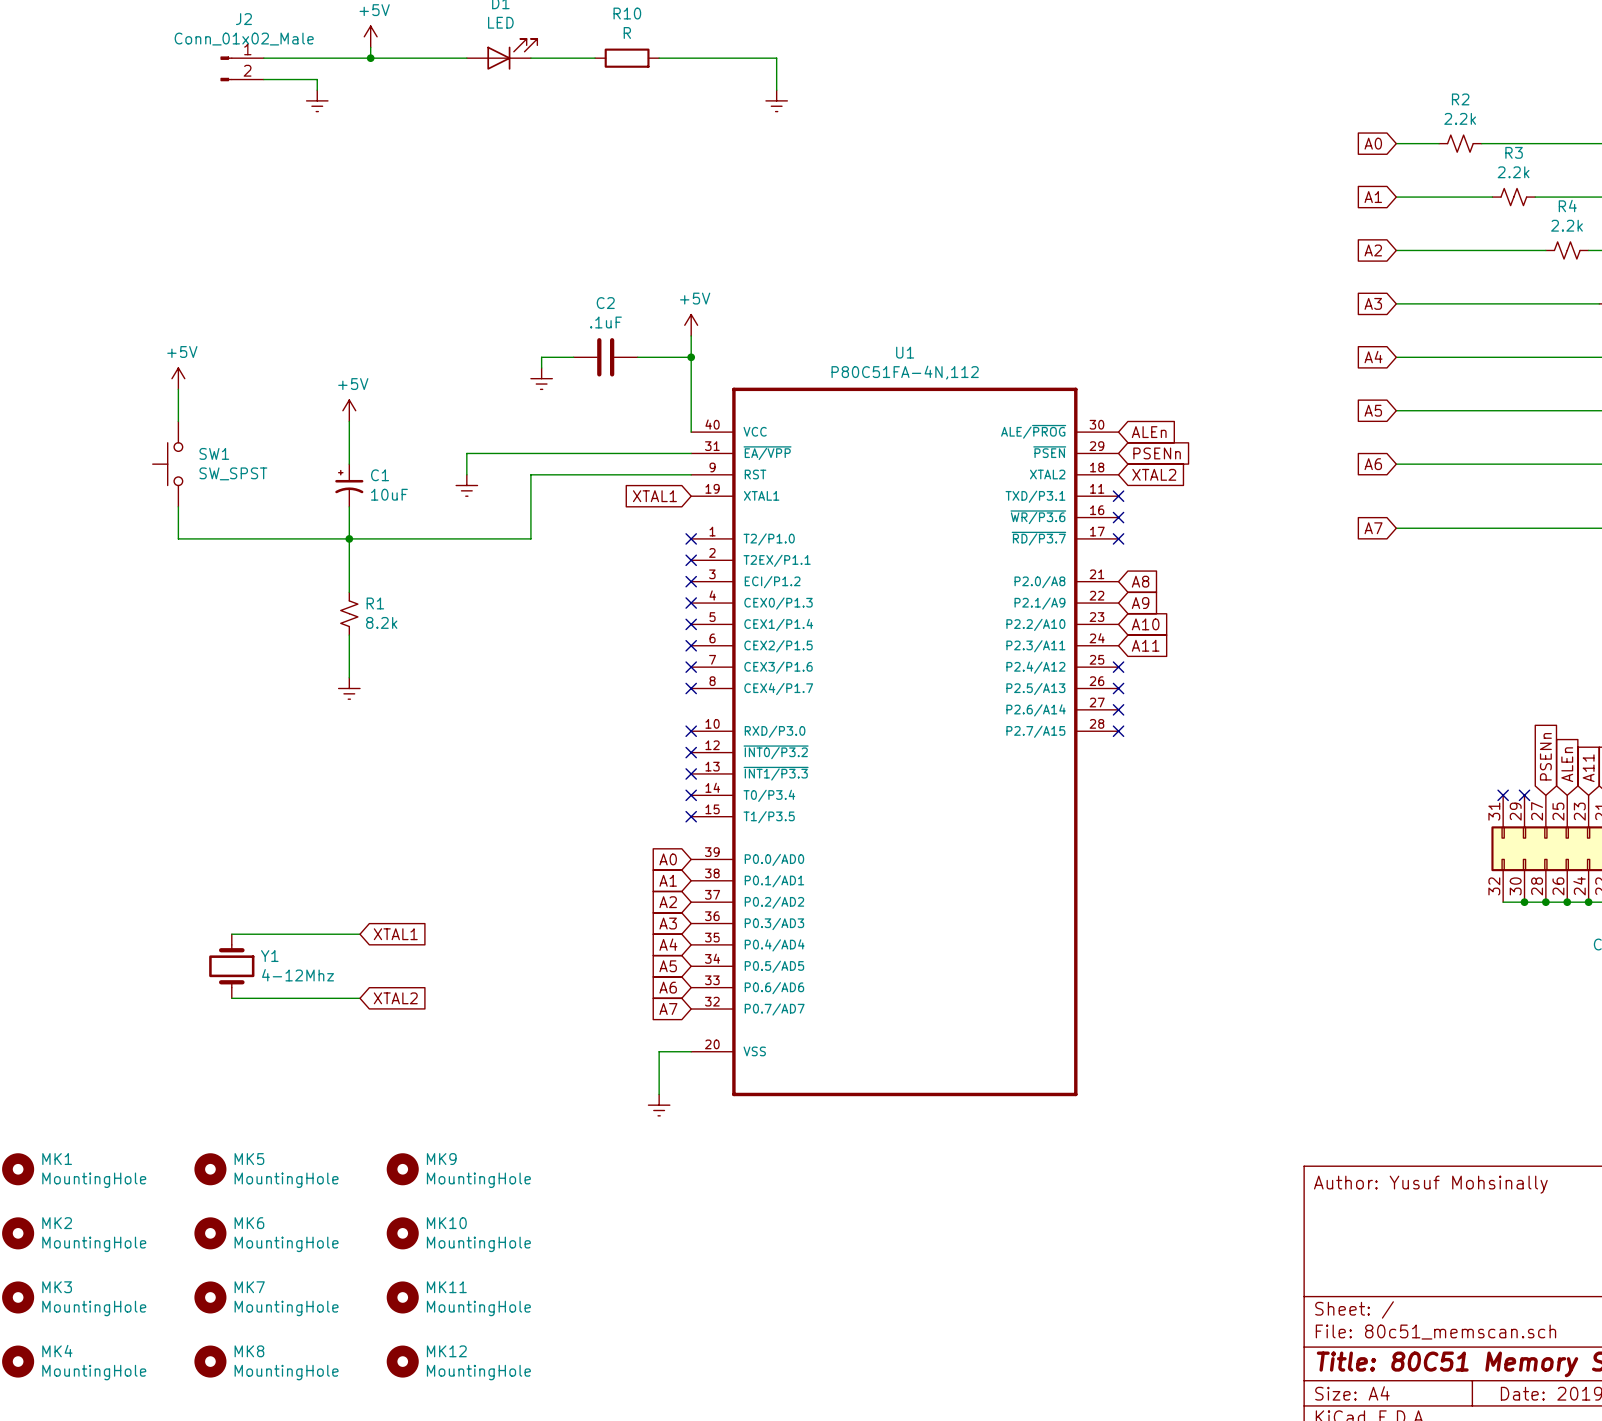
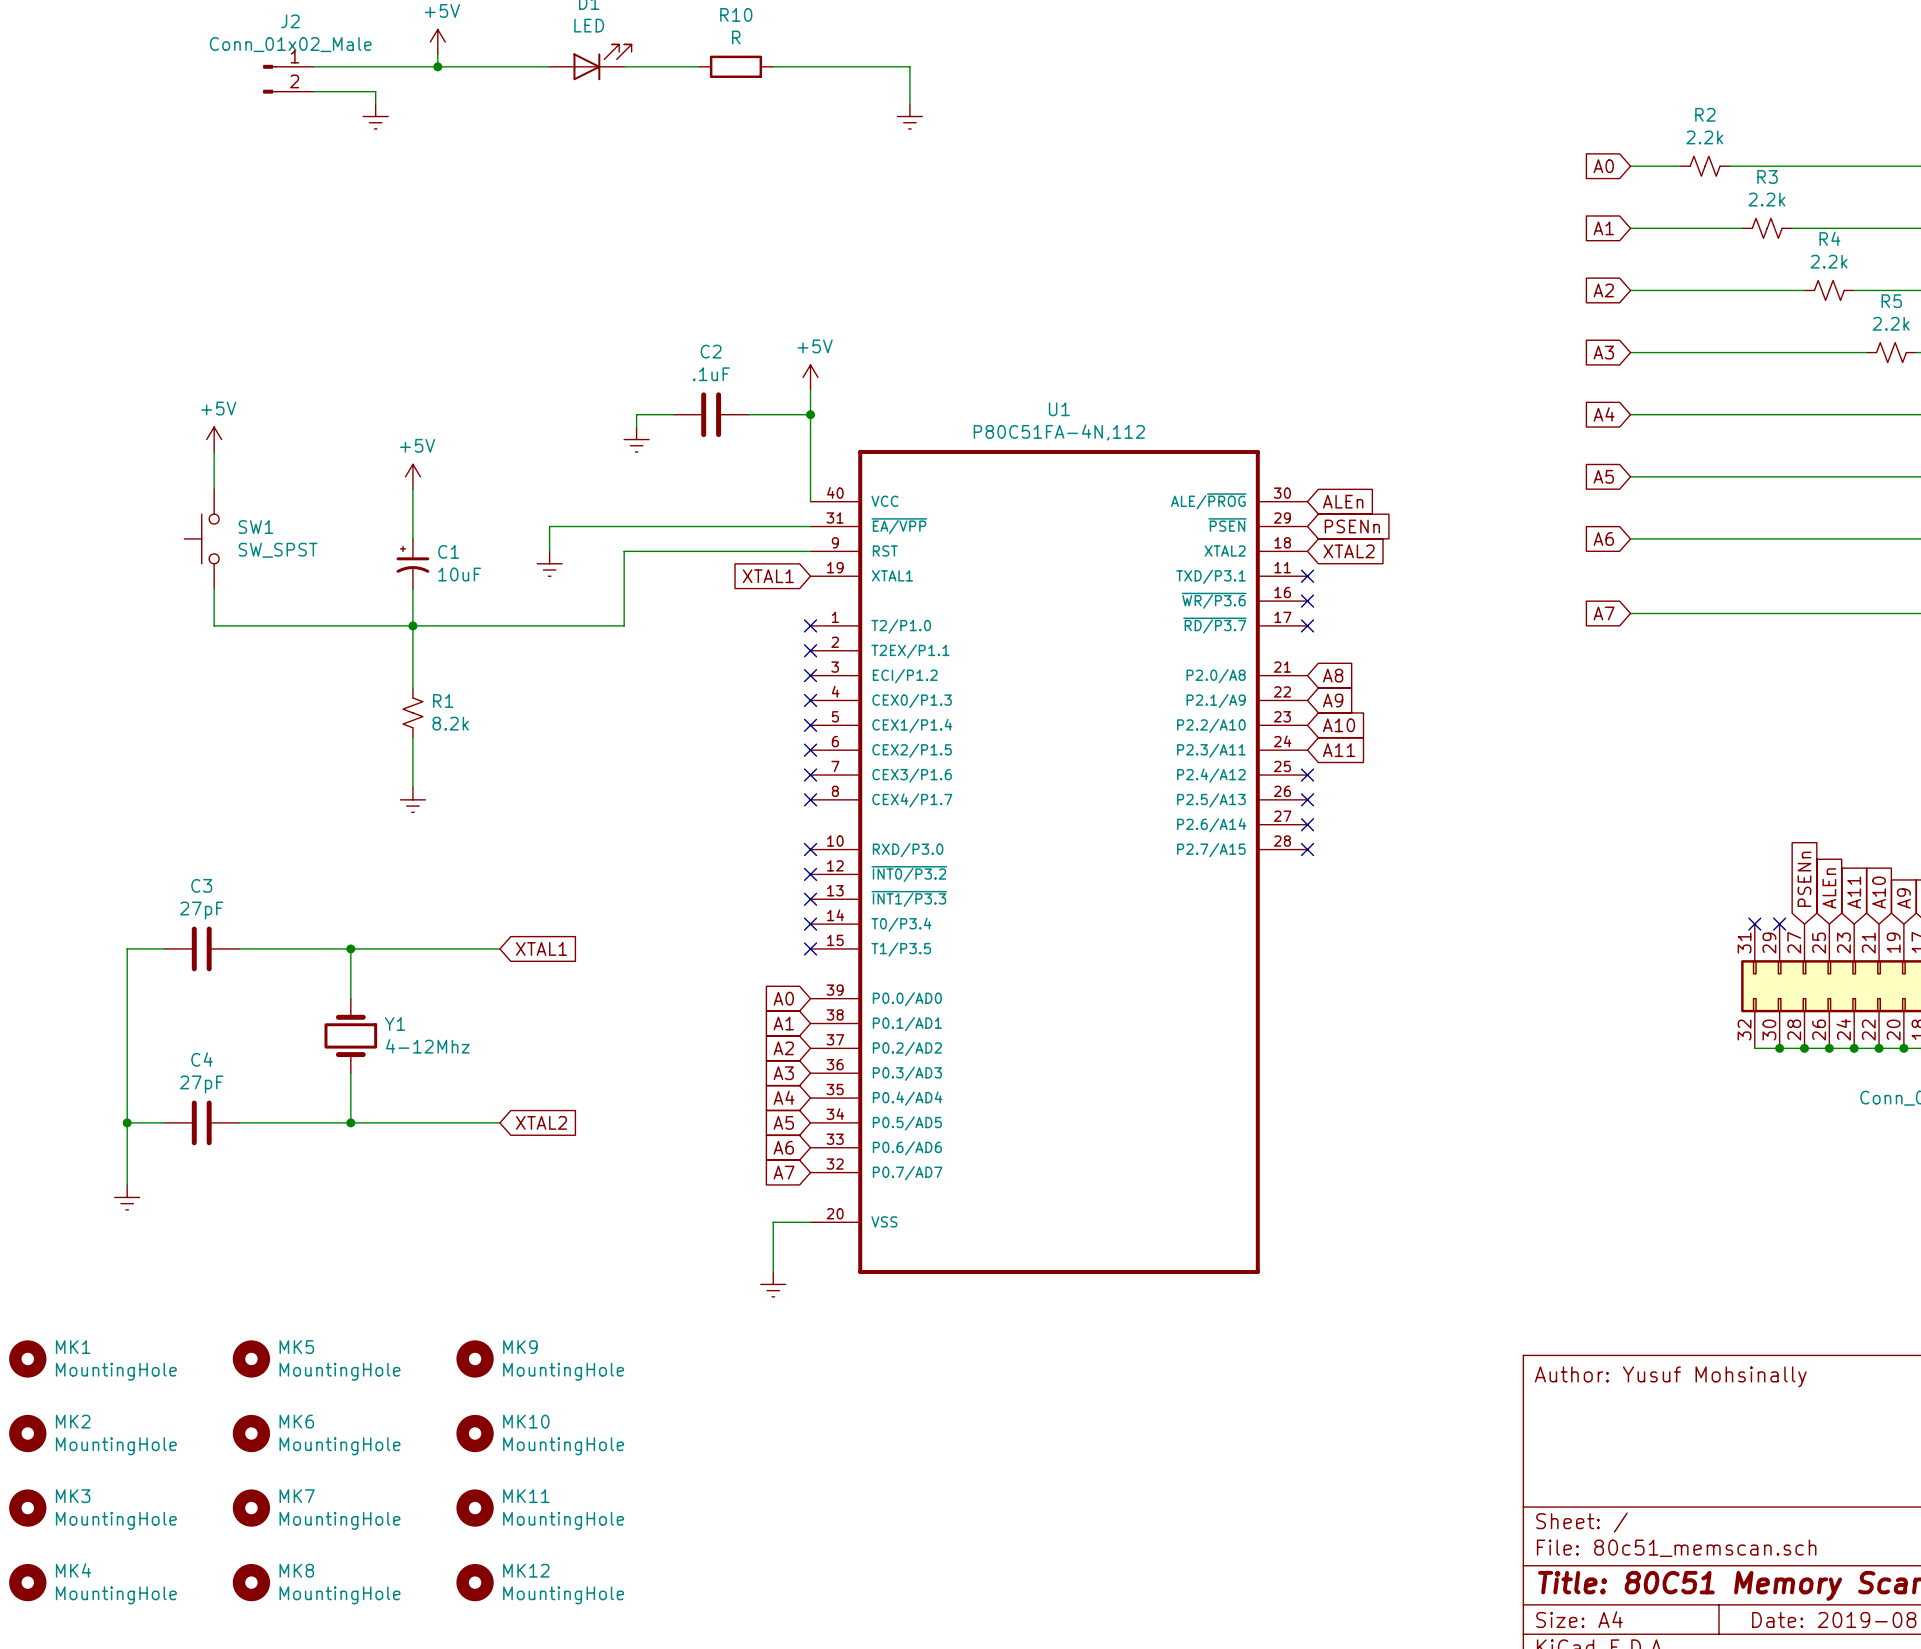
wire: none -> (164, 948) (127, 948) (127, 1185)
C3: none -> 27pF (201, 948)
wire: none -> (239, 948) (499, 948)
wire: none -> (350, 948) (350, 998)
junction: none -> (350, 948)
wire: none -> (350, 1073) (350, 1122)
wire: (231, 934) (360, 934) -> none
global label position: XTAL1 (395, 934) -> XTAL1 (541, 948)
wire: none -> (127, 1122) (164, 1122)
junction: none -> (127, 1122)
C4: none -> 27pF (201, 1122)
wire: none -> (239, 1122) (499, 1122)
Y1 position: (231, 966) -> (350, 1035)
junction: none -> (350, 1122)
wire: (231, 998) (360, 998) -> none
global label position: XTAL2 (395, 998) -> XTAL2 (541, 1122)
power symbol: none -> (127, 1197)

